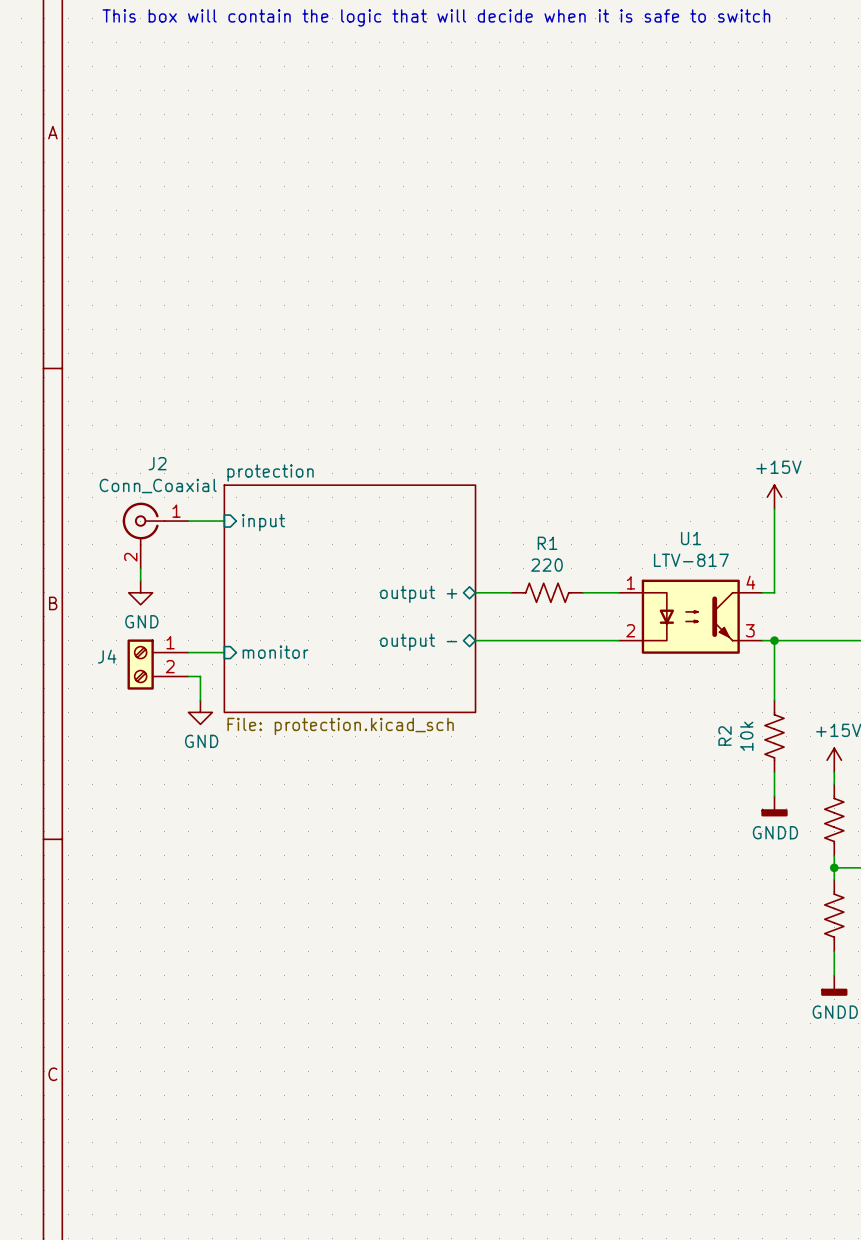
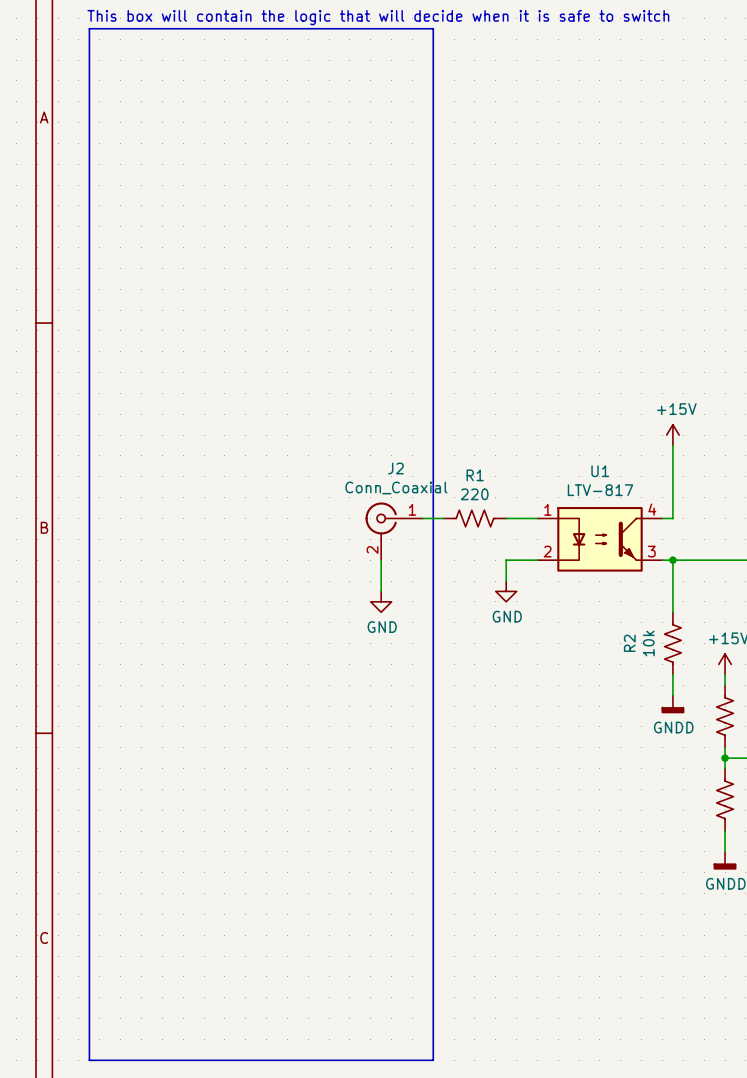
line: none -> (89, 28) (433, 28) (433, 1060) (89, 1060) (89, 28)
wire: (188, 521) (224, 521) -> none
sheet pin: input (263, 522) -> none
J2 position: (155, 535) -> (394, 531)
wire: (140, 568) (140, 580) -> none
power symbol: GND (140, 592) -> none
sheet pin: output + (418, 594) -> none
sheet protection: File: protection.kicad_sch (349, 598) -> none
wire: none -> (381, 560) (381, 591)
wire: (475, 640) (583, 640) -> (506, 581) (506, 560)
sheet pin: output - (418, 642) -> none
wire: (188, 652) (224, 652) -> none
sheet pin: monitor (275, 652) -> none
J4: (158, 664) -> none
wire: (188, 676) (200, 676) (200, 700) -> none
power symbol: none -> GND (506, 591)
power symbol: none -> GND (381, 601)
power symbol: GND (200, 712) -> none

